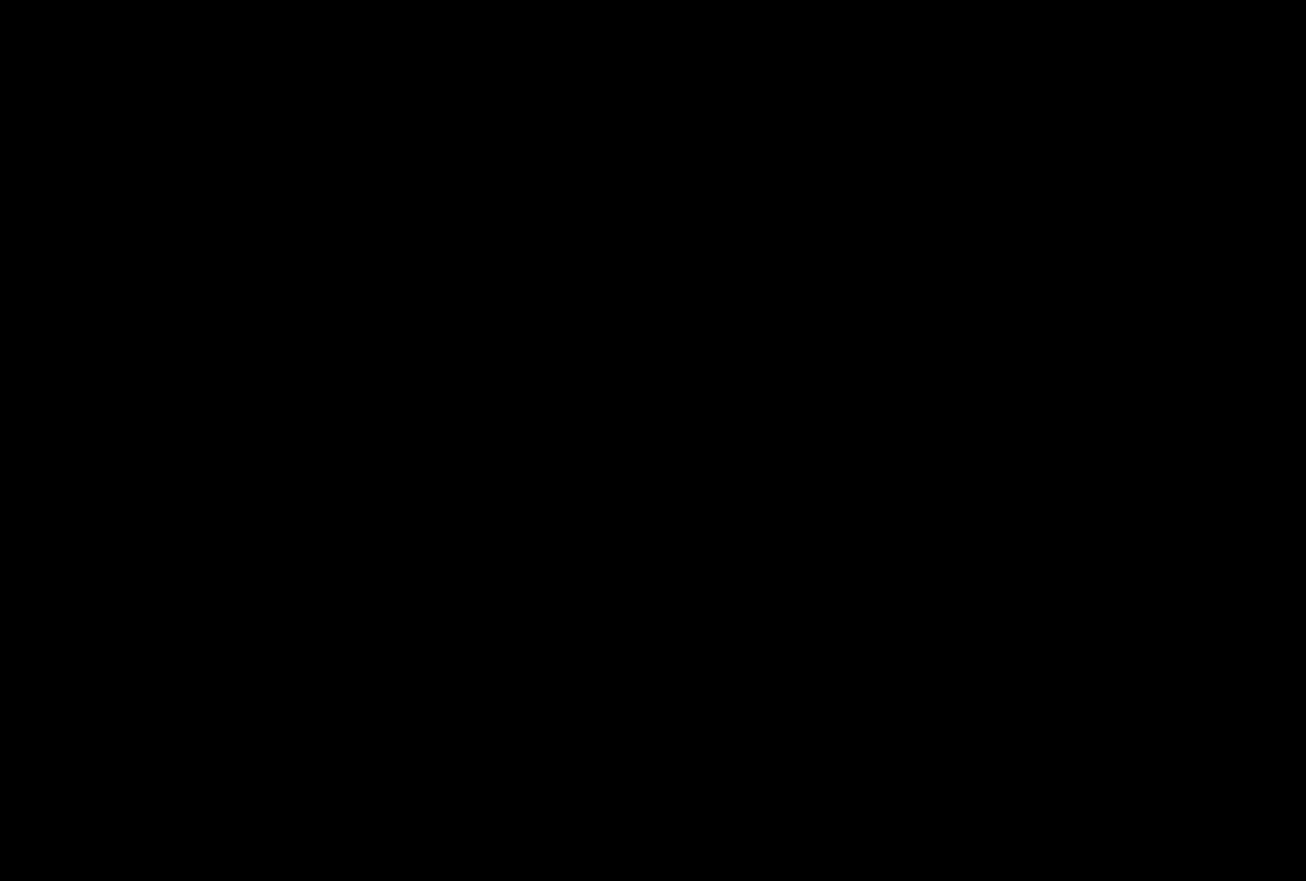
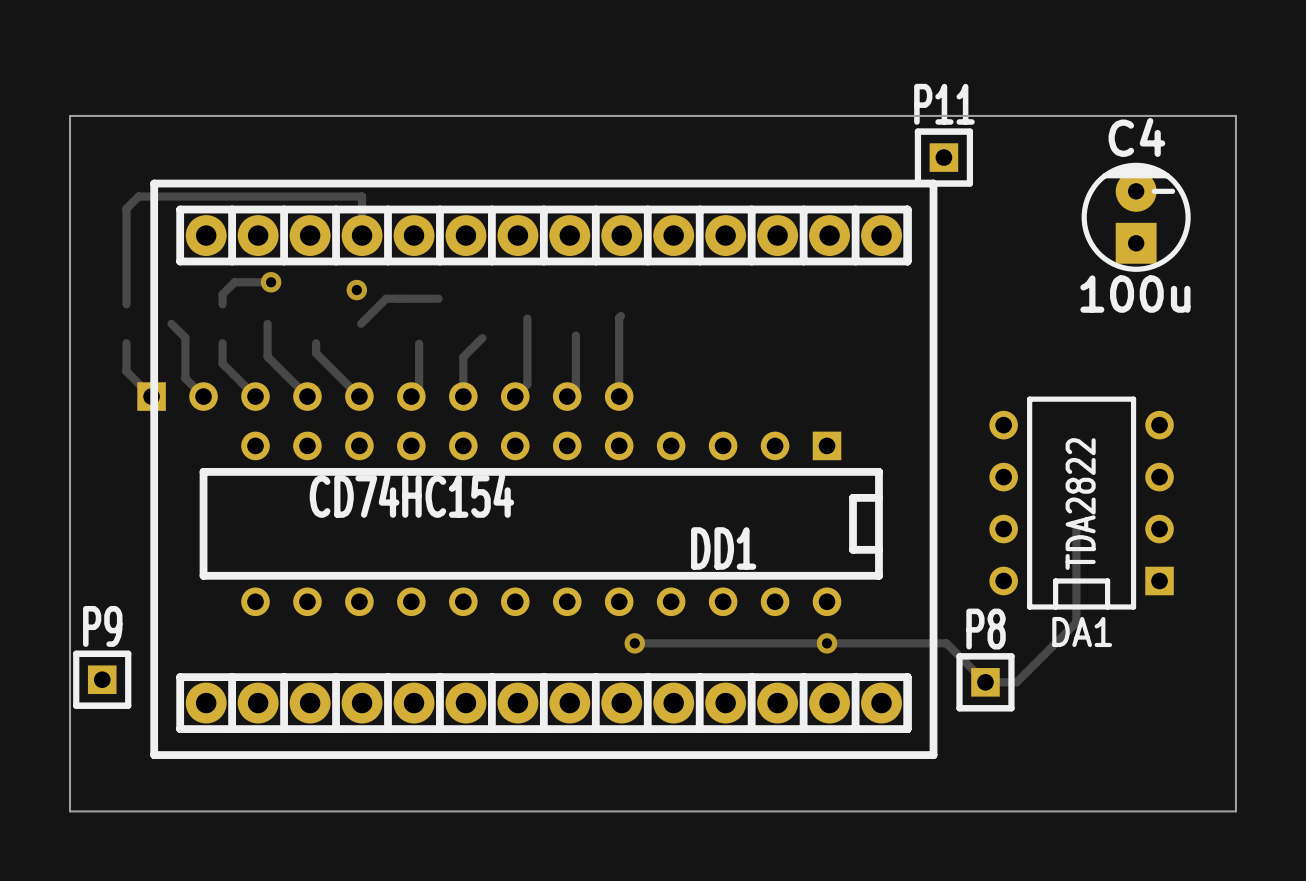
board edge: none -> (70, 115) (70, 811) (1235, 811) (1235, 115) (70, 115)
P11: none -> (943, 157)
C4: none -> 100u (1136, 217)
track: none -> (362, 235) (362, 196) (138, 196) (126, 208) (126, 304)
track: none -> (271, 282) (234, 282) (222, 294) (222, 304)
via: none -> (271, 282)
via: none -> (356, 290)
track: none -> (438, 298) (386, 298) (361, 323)
track: none -> (620, 316) (619, 317) (619, 396)
track: none -> (527, 318) (527, 384) (515, 396)
track: none -> (171, 323) (185, 337) (185, 378) (203, 396)
track: none -> (267, 323) (267, 356) (307, 396)
track: none -> (575, 335) (575, 387) (567, 396)
track: none -> (482, 338) (463, 357) (463, 396)
track: none -> (126, 343) (126, 371) (151, 396)
track: none -> (222, 343) (222, 363) (255, 396)
track: none -> (316, 343) (316, 353) (359, 396)
track: none -> (419, 343) (419, 388) (411, 396)
part: none -> (385, 396)
part: none -> (543, 469)
DA1: none -> TDA2822 (1081, 503)
DD1: none -> CD74HC154 (541, 523)
track: none -> (1076, 529) (1076, 622) (1016, 682) (985, 682) (946, 643) (634, 643)
via: none -> (634, 643)
via: none -> (827, 643)
P9: none -> (102, 679)
P8: none -> (985, 682)

